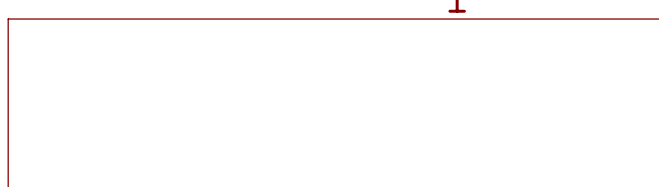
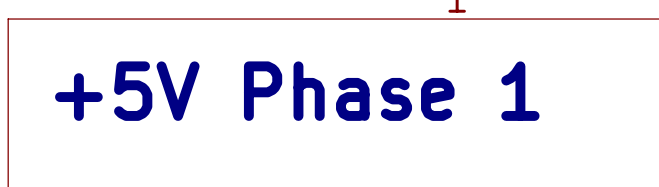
text: none -> +5V Phase 1 (297, 91)

